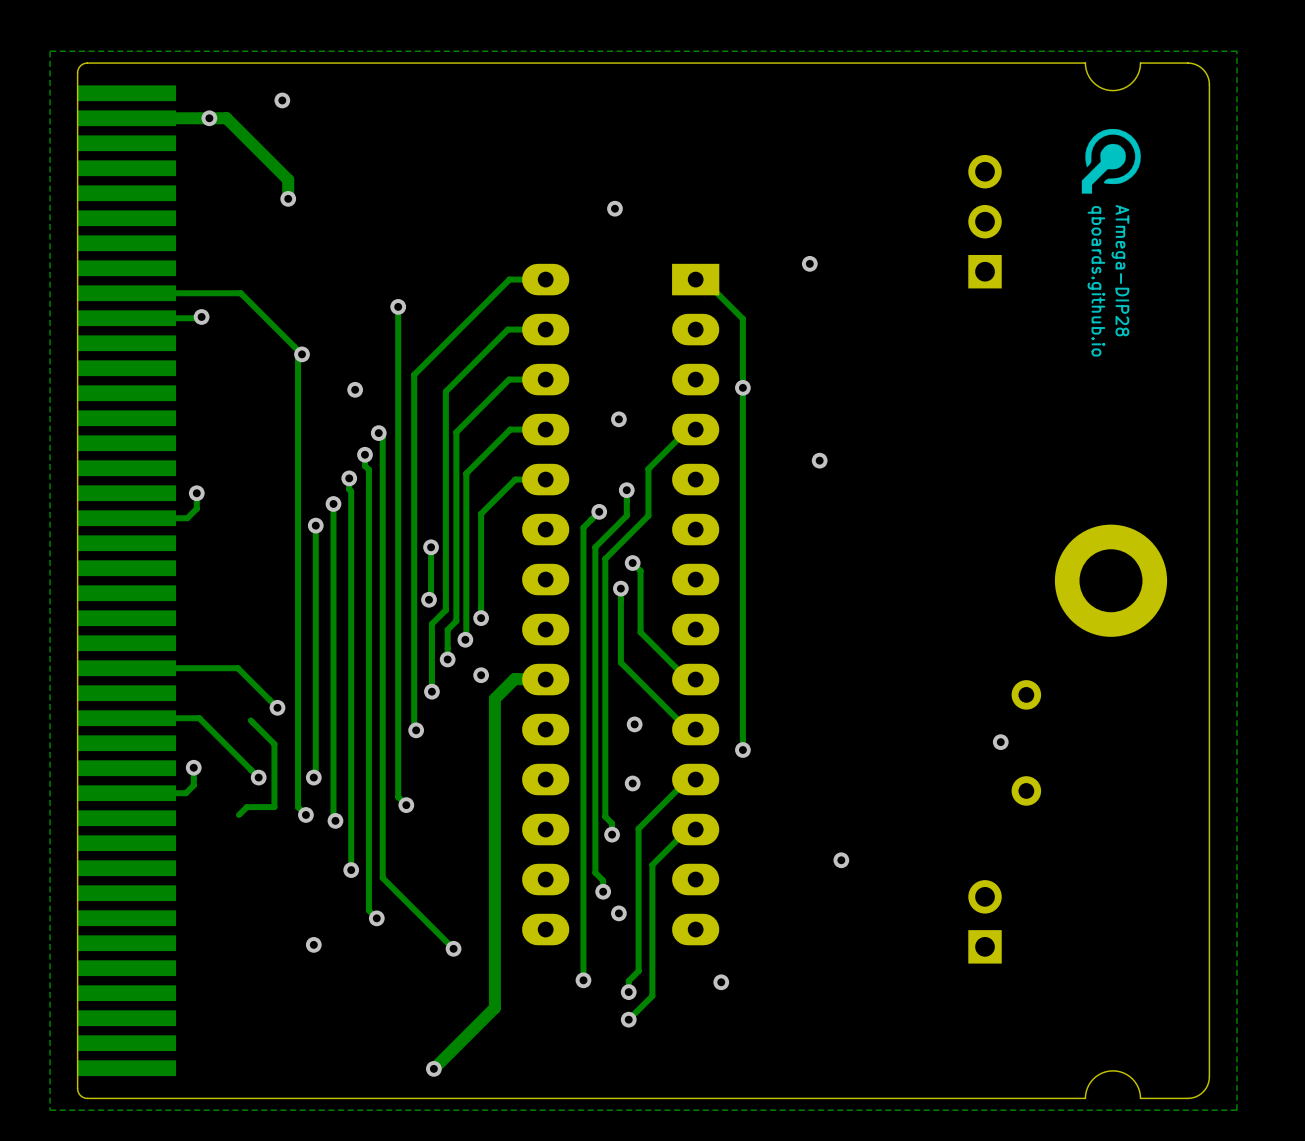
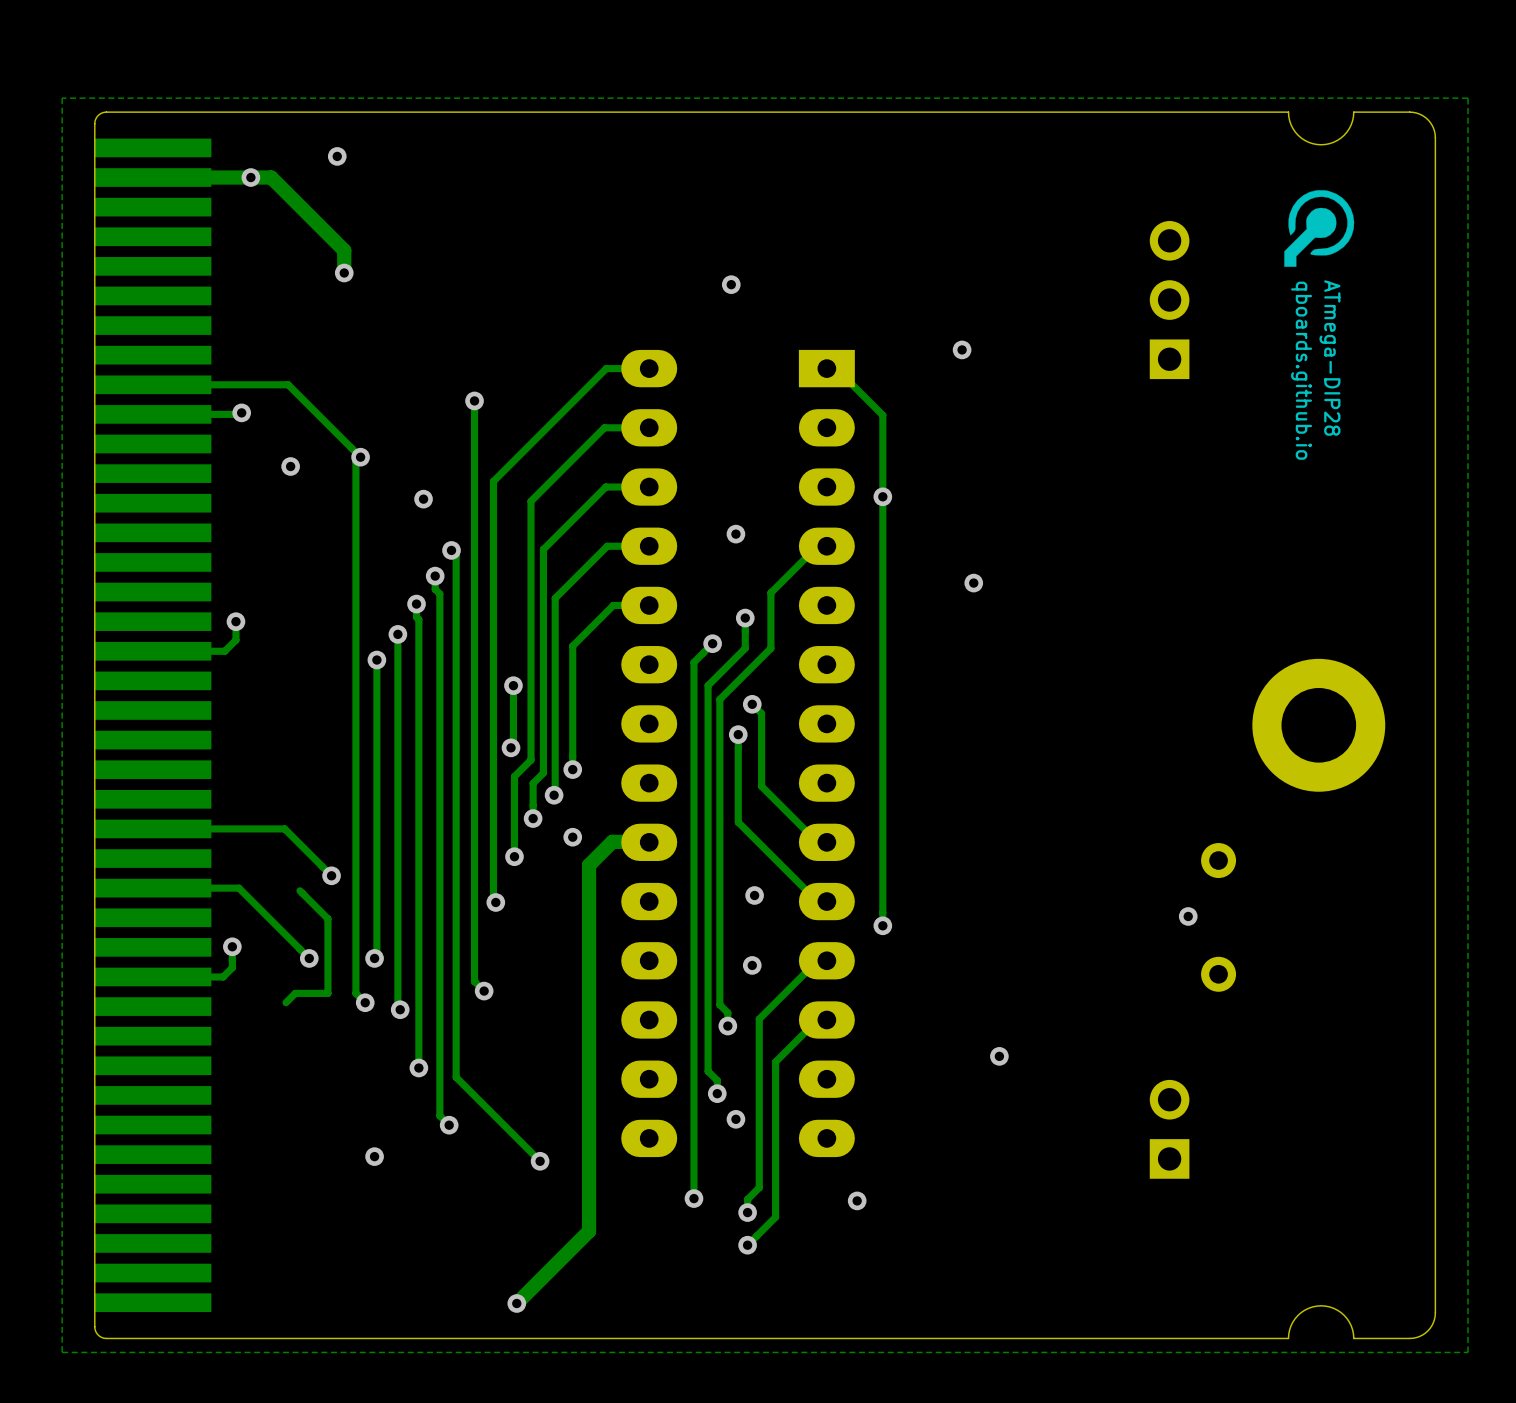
via: none -> (290, 466)

